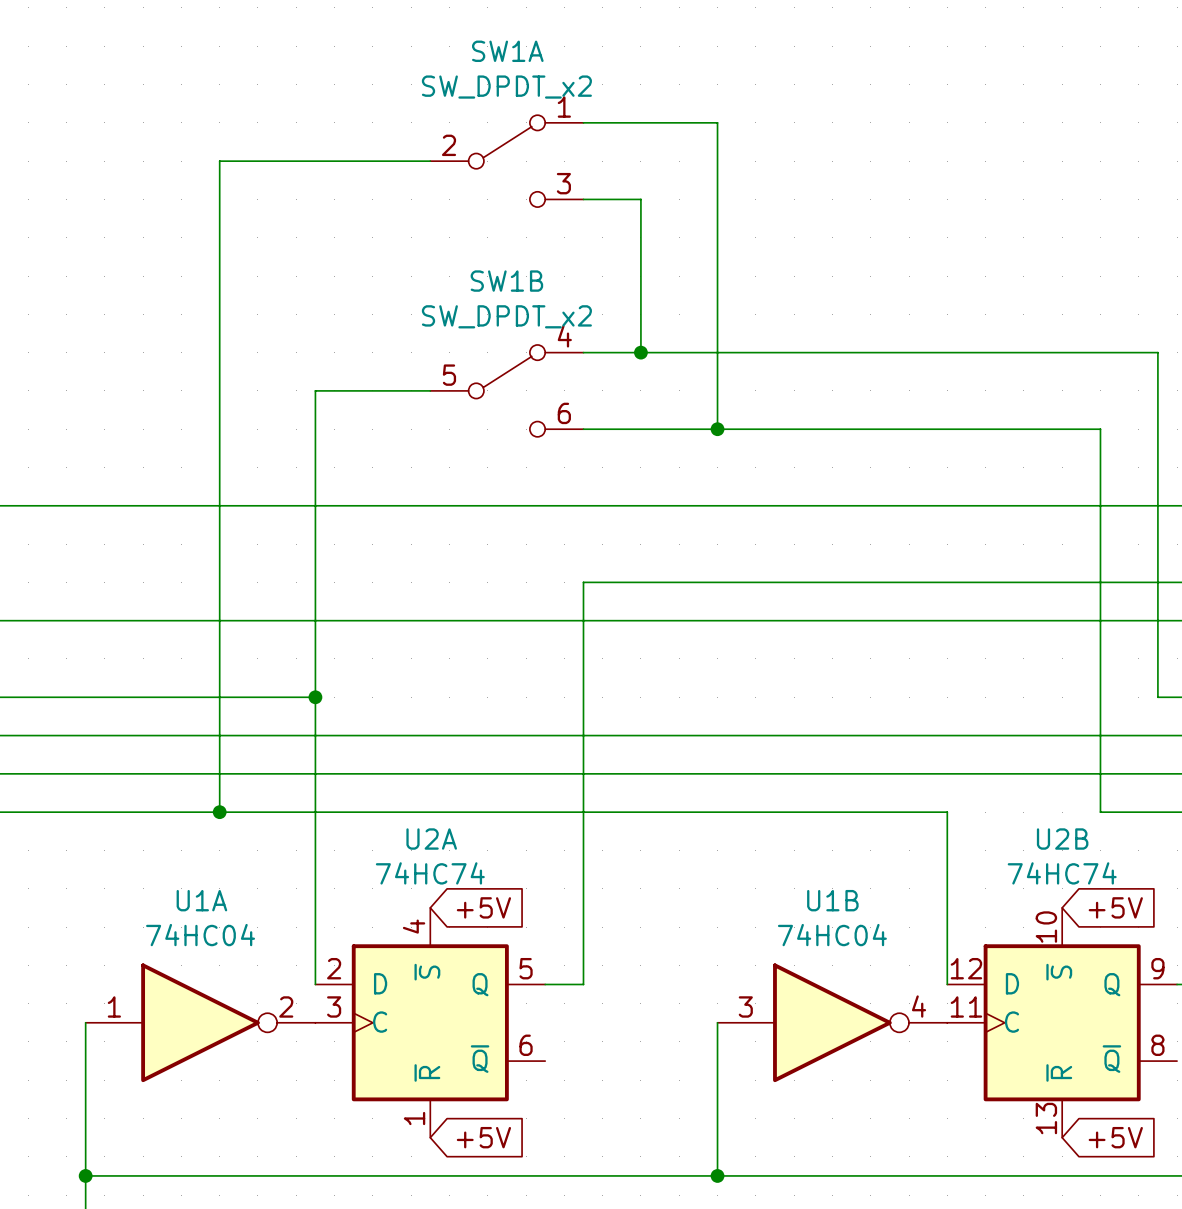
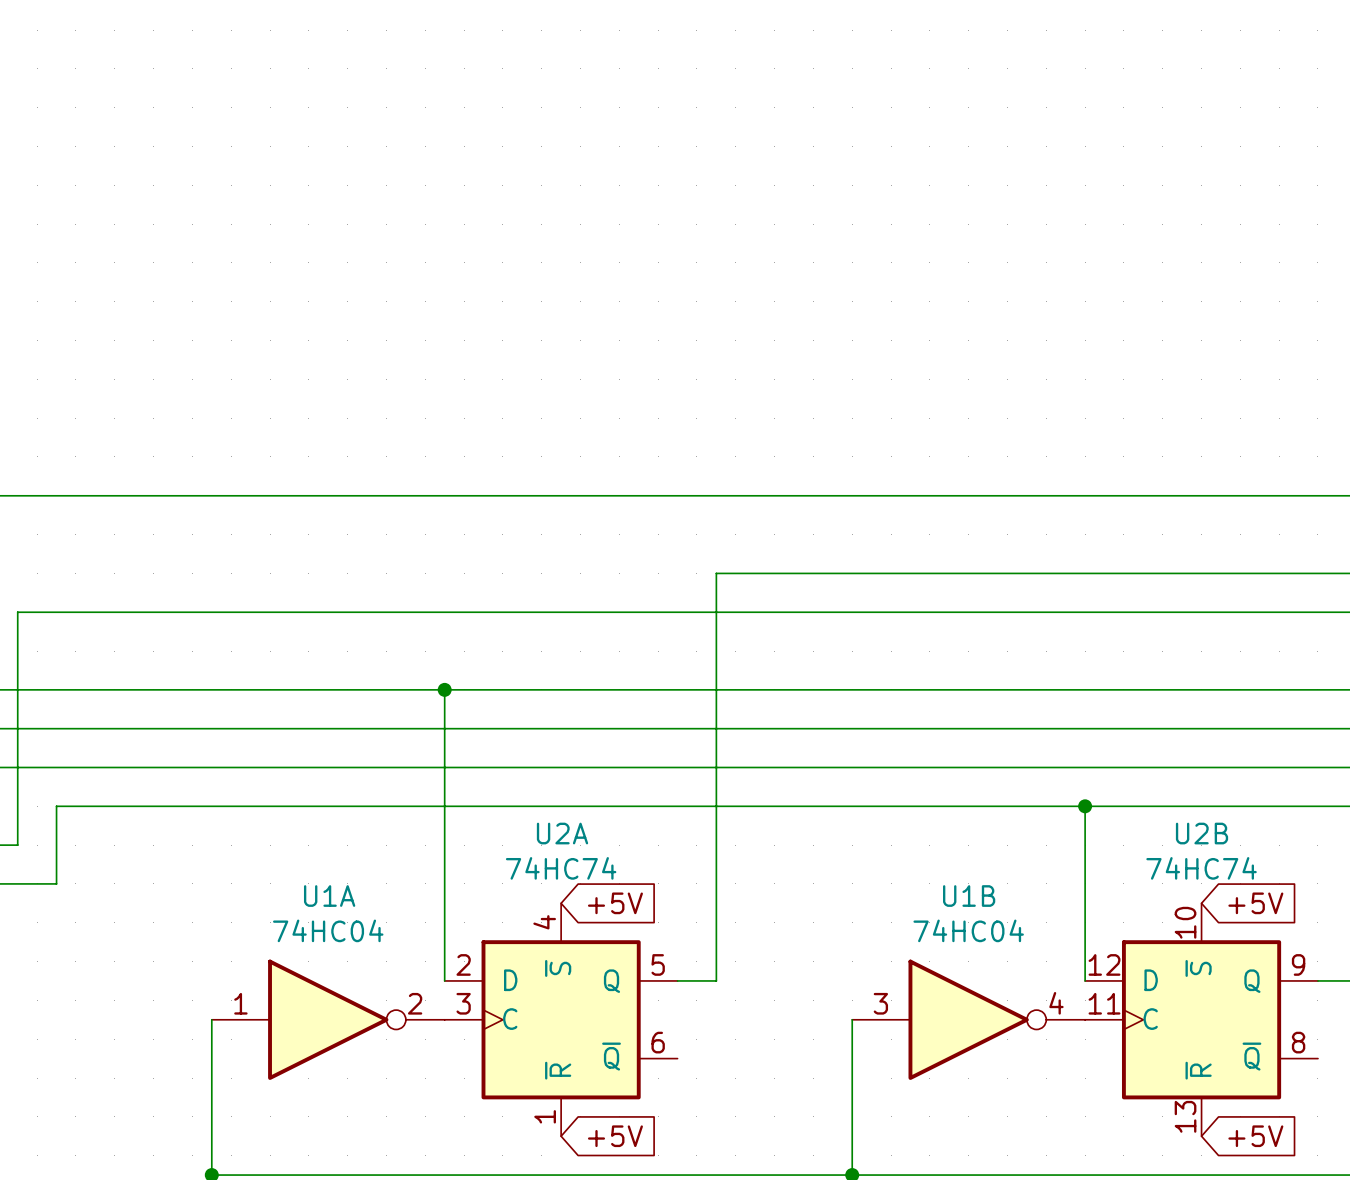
wire: (583, 122) (717, 122) (717, 429) -> none
wire: (430, 161) (219, 161) (219, 812) -> none
SW1A: SW_DPDT_x2 (506, 161) -> none
wire: (583, 199) (640, 199) (640, 352) -> none
wire: (583, 352) (1157, 352) (1157, 697) -> (444, 689) (1298, 689)
junction: (640, 352) -> none
wire: (430, 390) (315, 390) (315, 697) -> none
SW1B: SW_DPDT_x2 (506, 390) -> none
wire: (583, 429) (1100, 429) (1100, 812) -> (1085, 806) (1240, 806)
junction: (717, 429) -> none
junction: (219, 812) -> none
junction: none -> (1085, 806)

